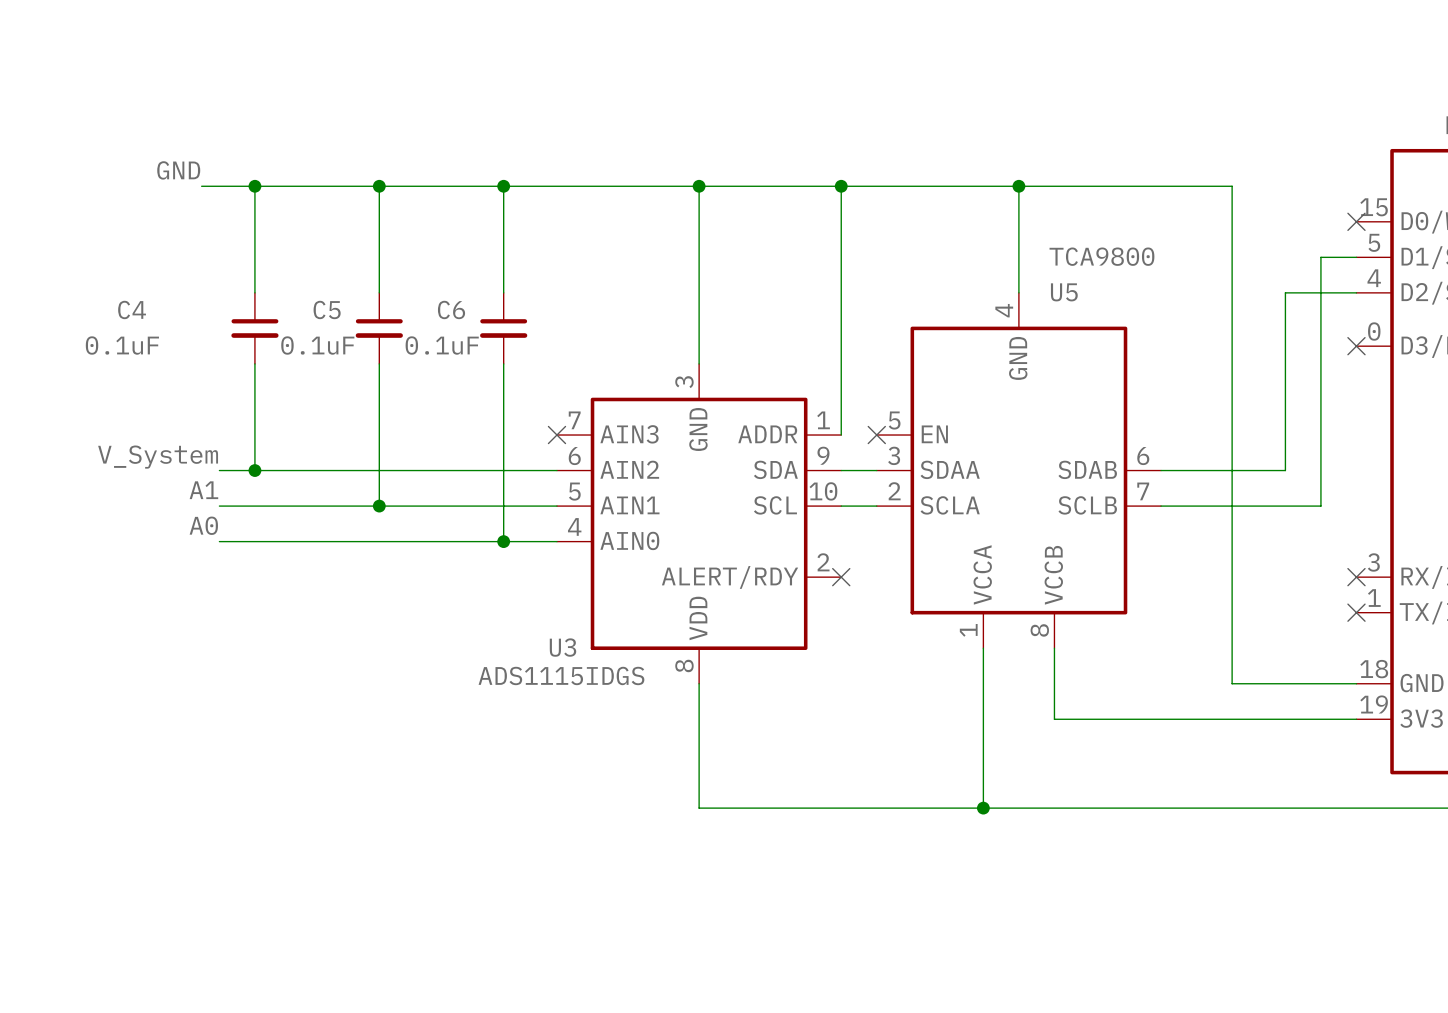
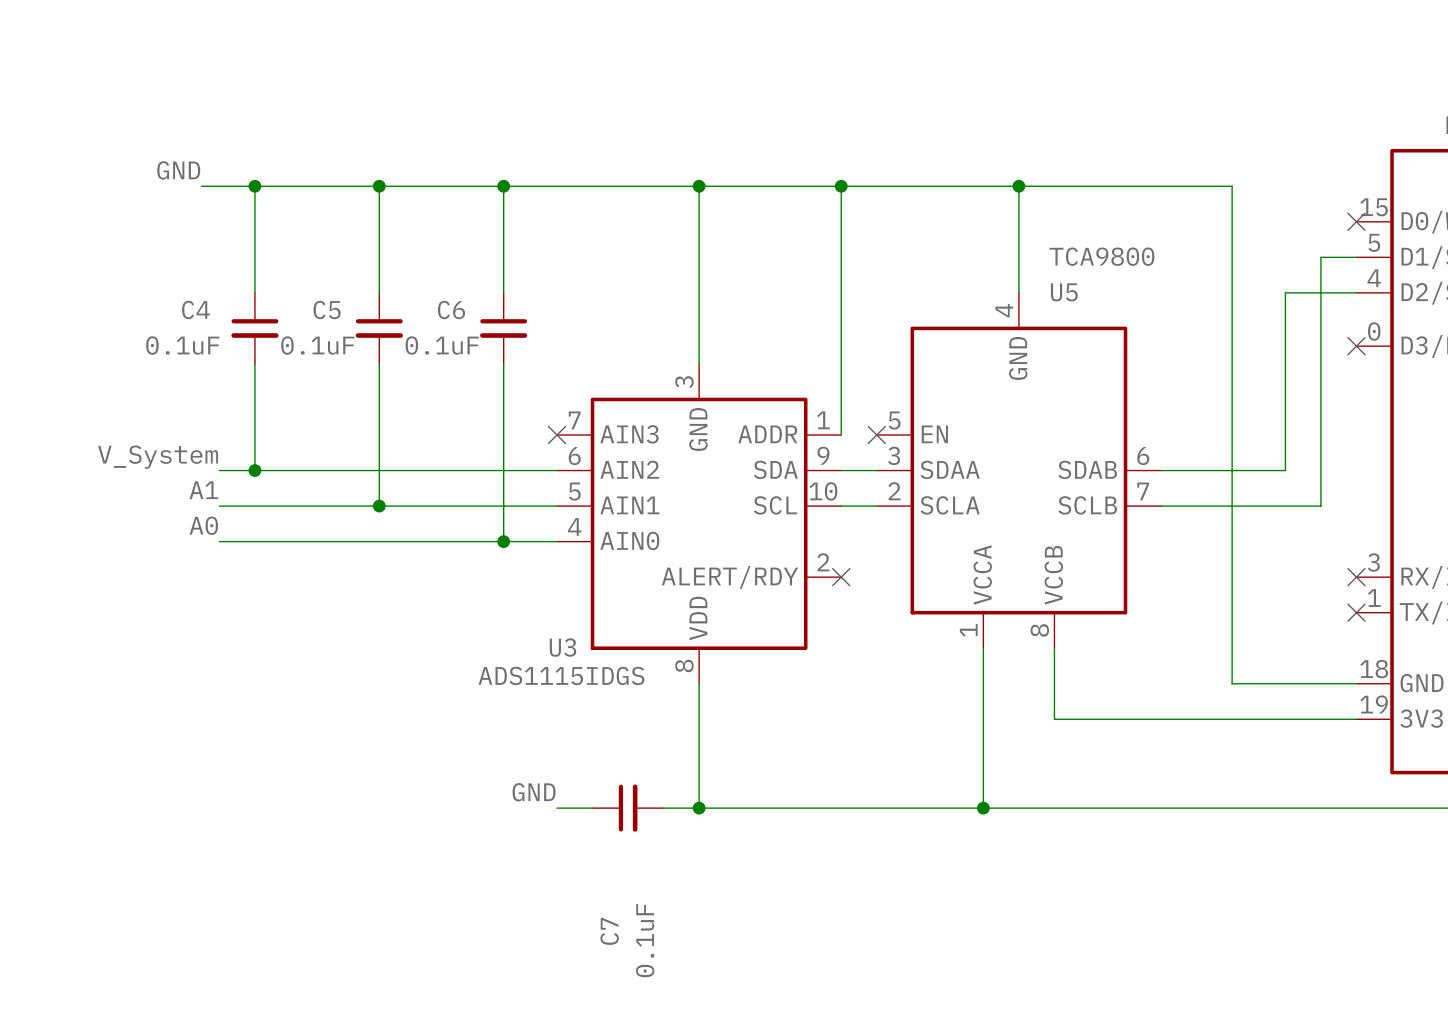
C4 name position: C4 (132, 309) -> C4 (196, 309)
C4 value position: 0.1uF (122, 345) -> 0.1uF (182, 345)
label: none -> GND (534, 792)
wire: none -> (556, 808) (592, 808)
C7: none -> 0.1uF (628, 808)
wire: none -> (663, 808) (699, 808)
junction: none -> (699, 808)

